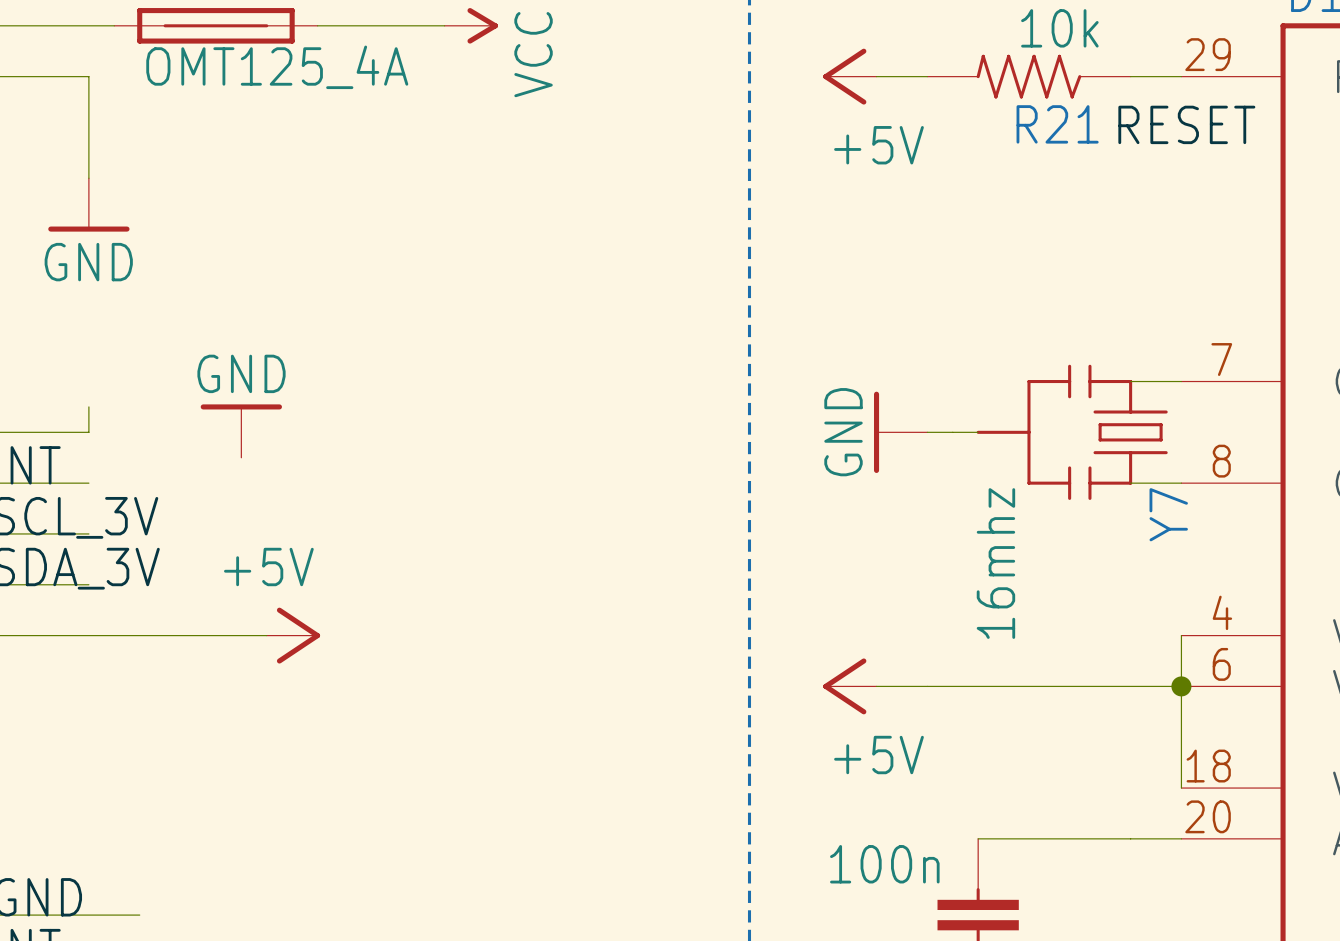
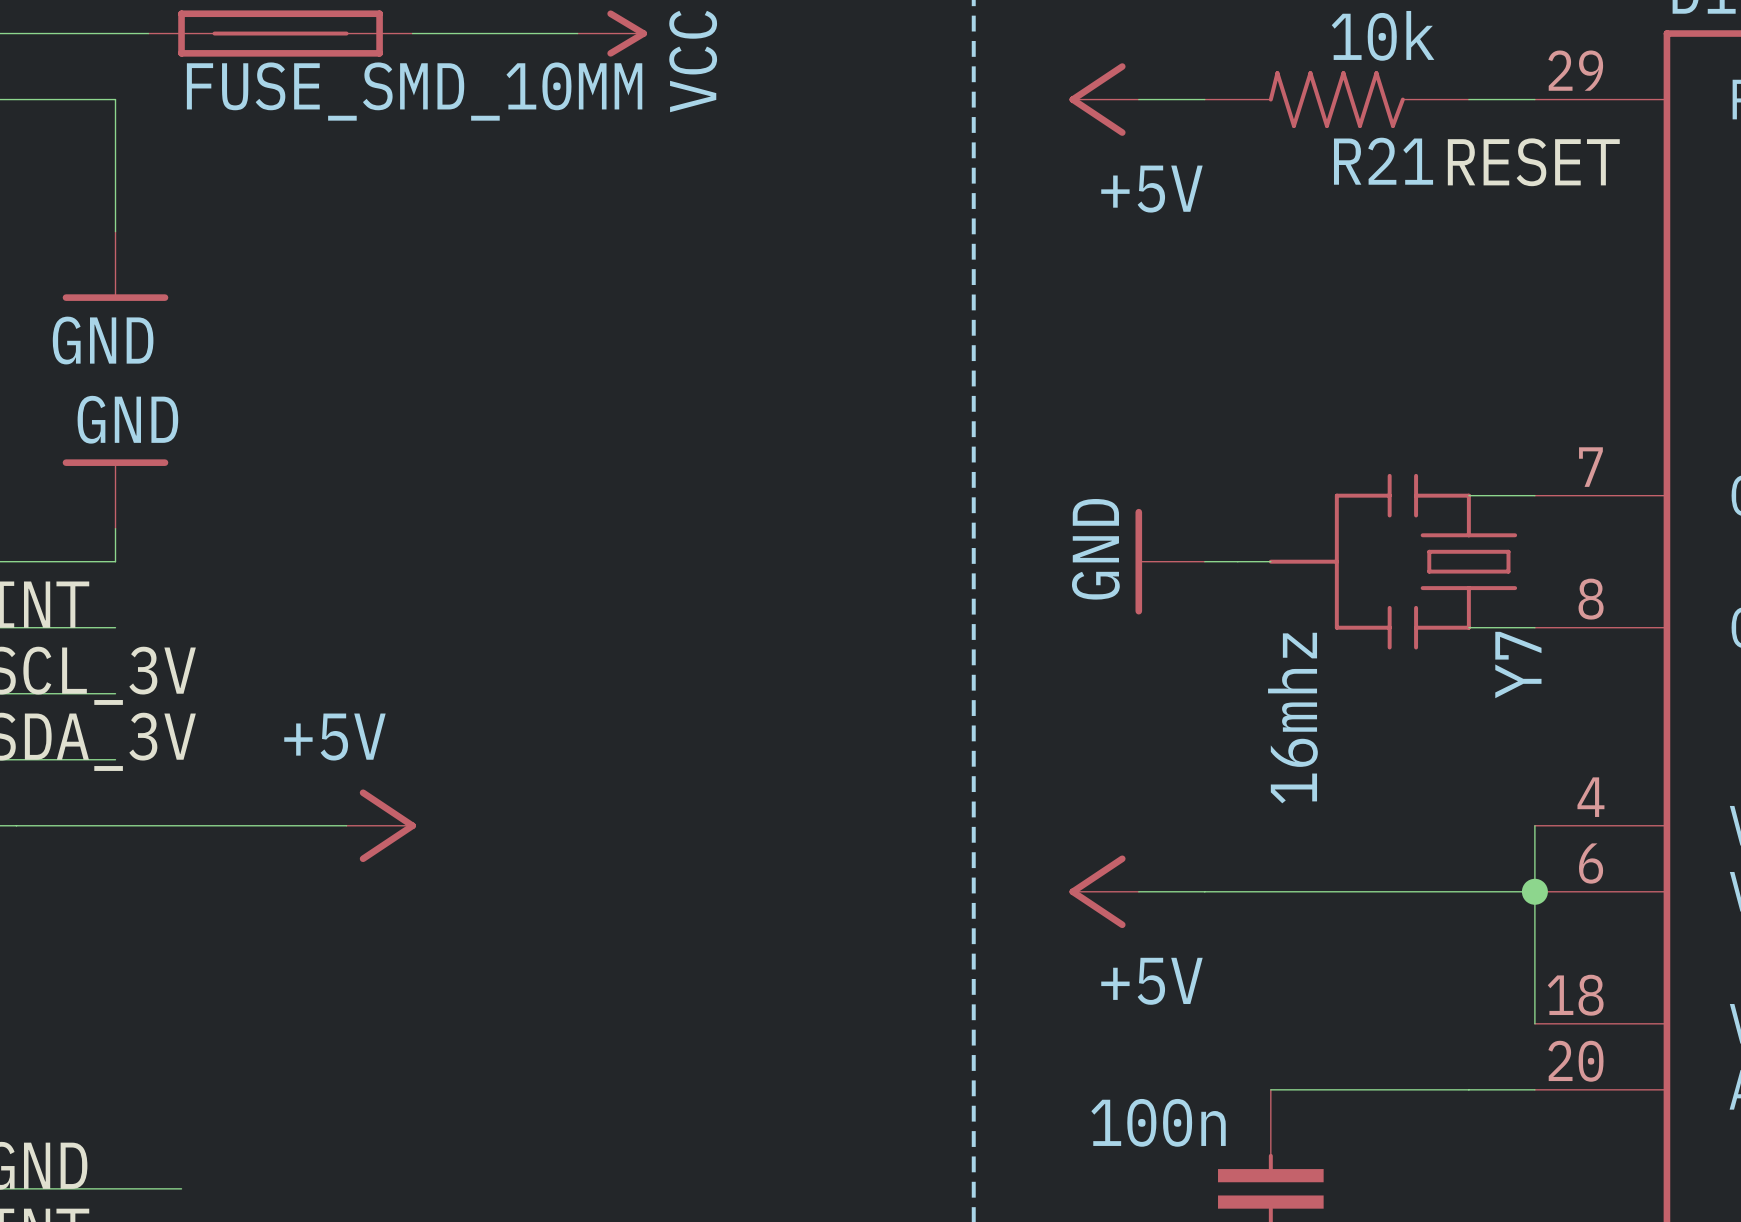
part value: OMT125_4A (277, 67) -> FUSE_SMD_10MM (414, 91)
power symbol position: GND (241, 431) -> GND (115, 494)

